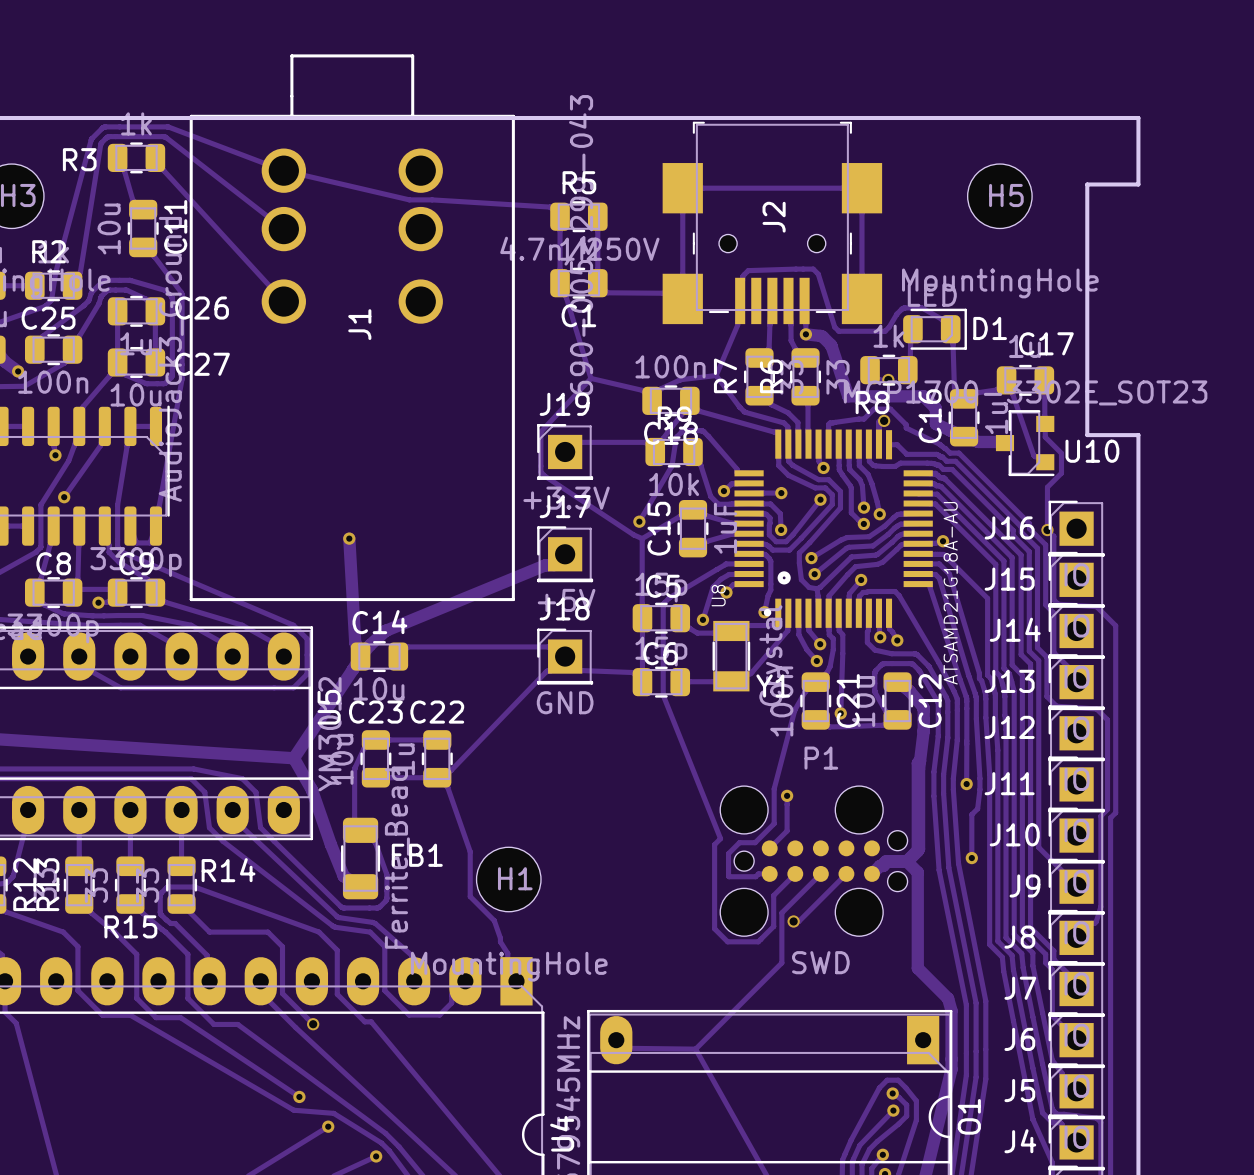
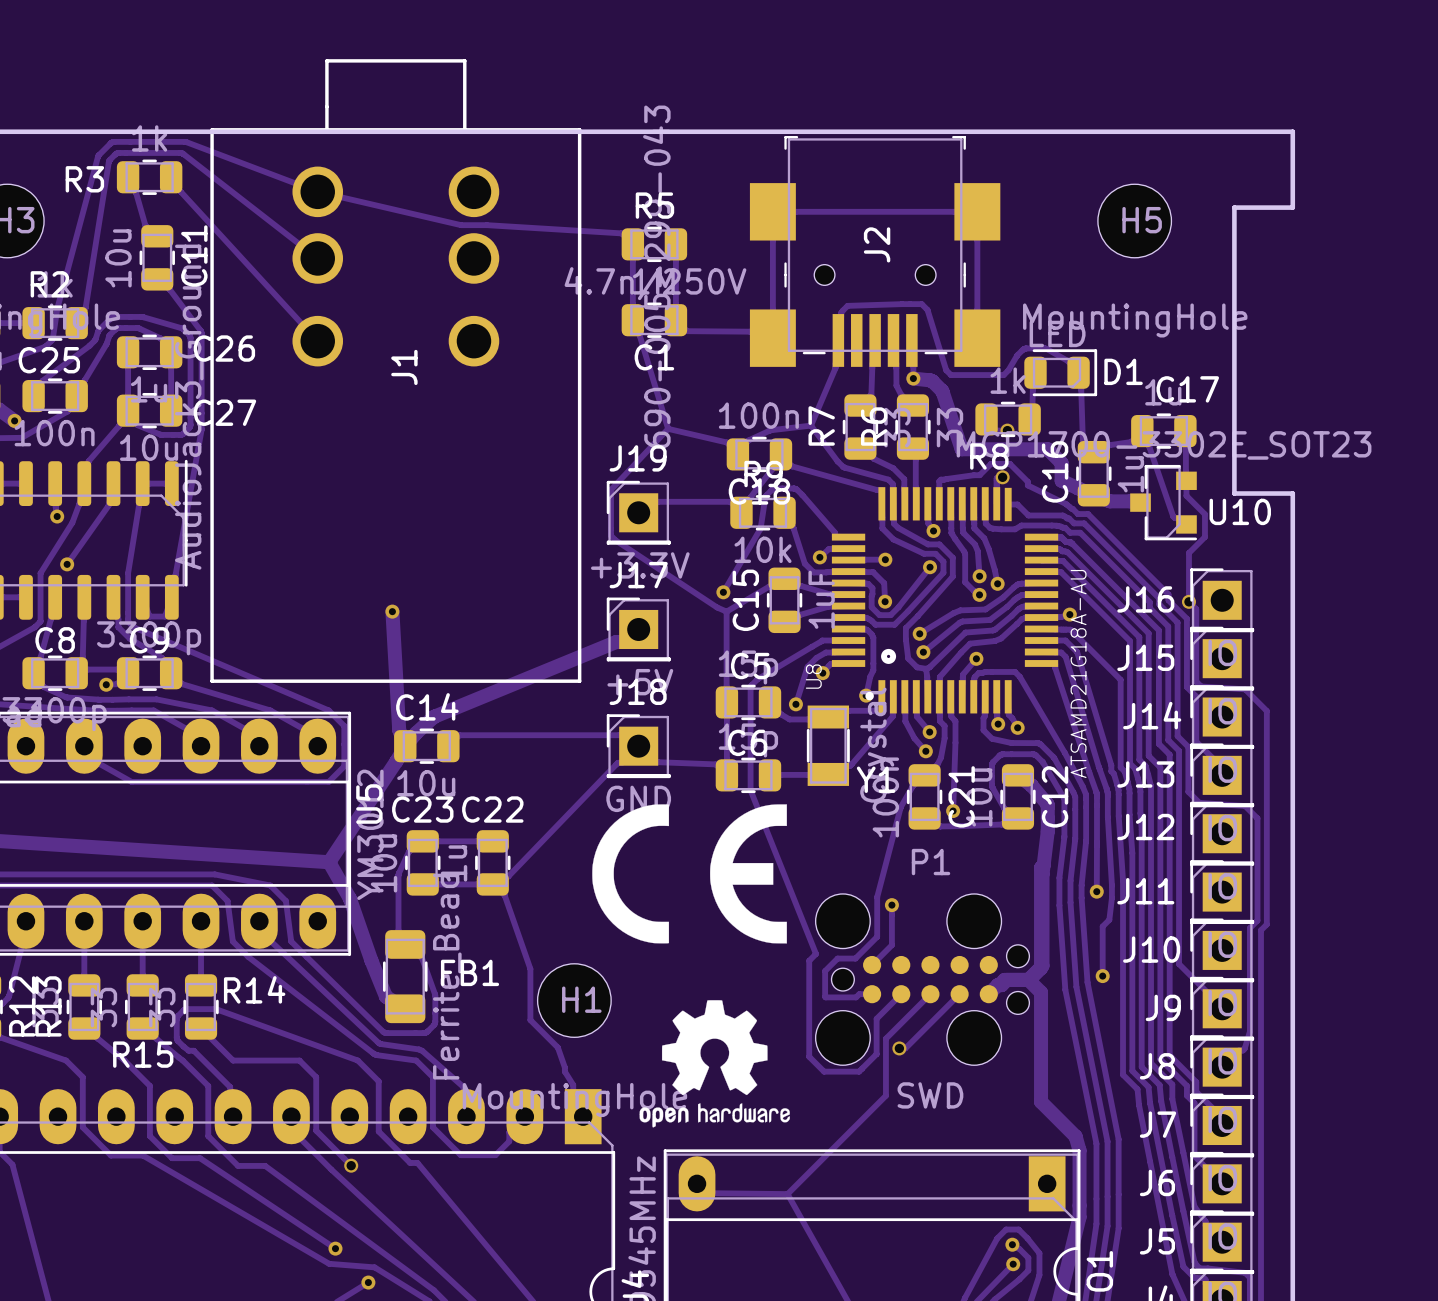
drawing: none -> [592, 804, 787, 944]
drawing: none -> [639, 1000, 790, 1128]

